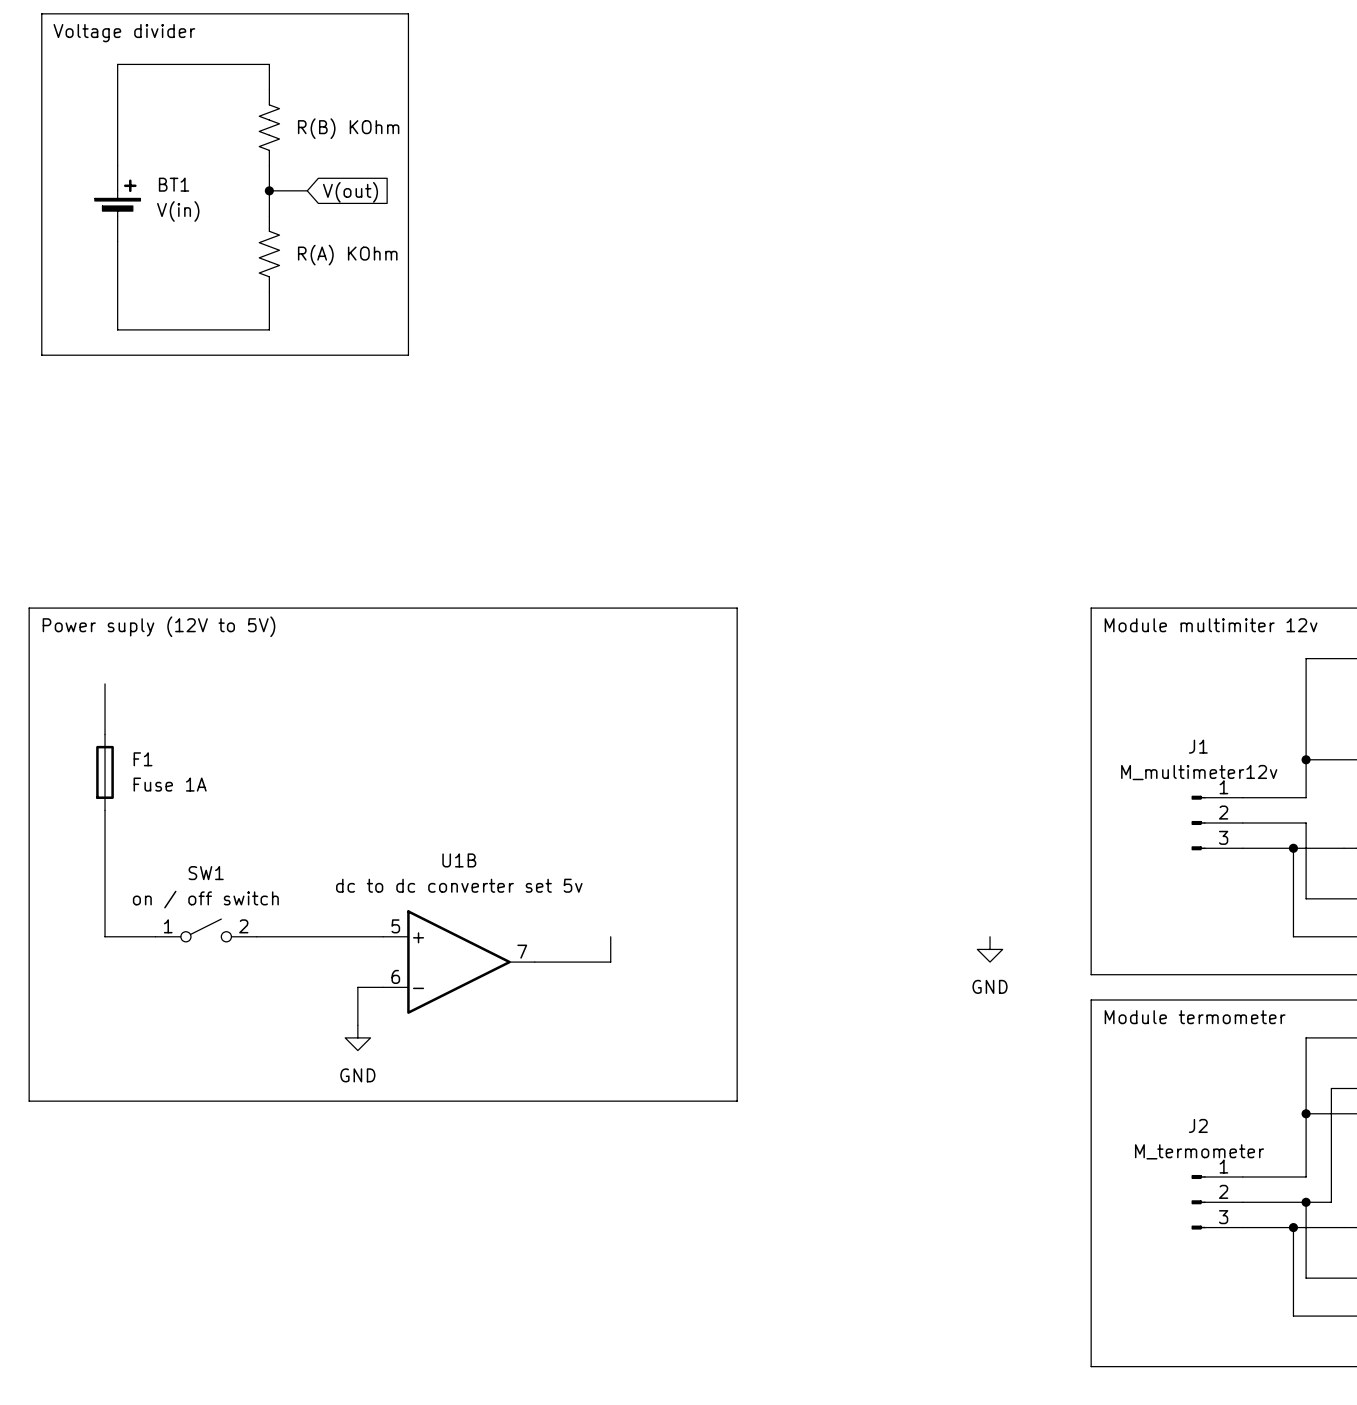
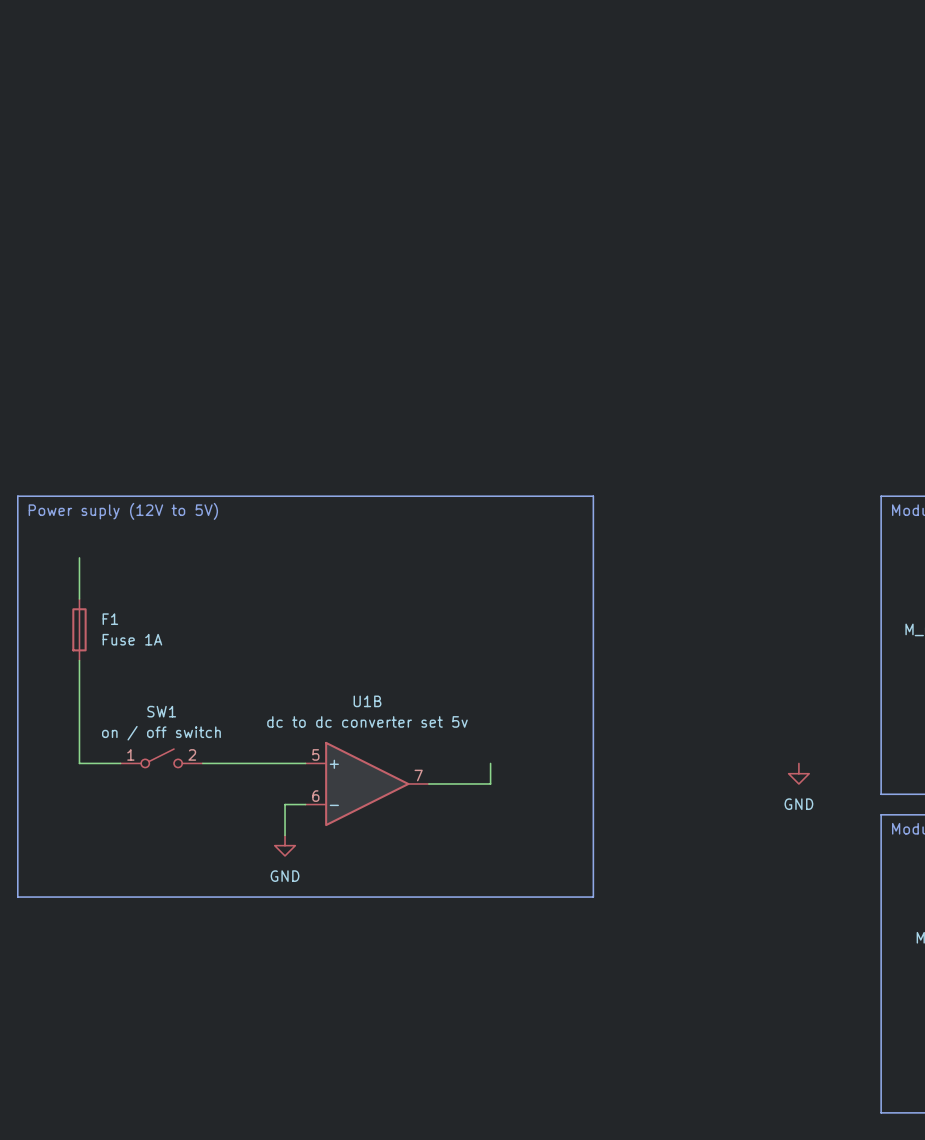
line: (41, 13) (408, 13) (408, 355) (41, 355) (41, 13) -> none
text: Voltage divider (124, 33) -> none
wire: (269, 89) (269, 64) (117, 64) (117, 165) -> none
part: R(B) KOhm (269, 127) -> none
wire: (269, 165) (269, 216) -> none
wire: (269, 190) (307, 190) -> none
junction: (269, 190) -> none
global label: V(out) (350, 192) -> none
BT1: V(in) (117, 203) -> none
wire: (117, 241) (117, 329) (269, 329) (269, 291) -> none
part: R(A) KOhm (269, 254) -> none

